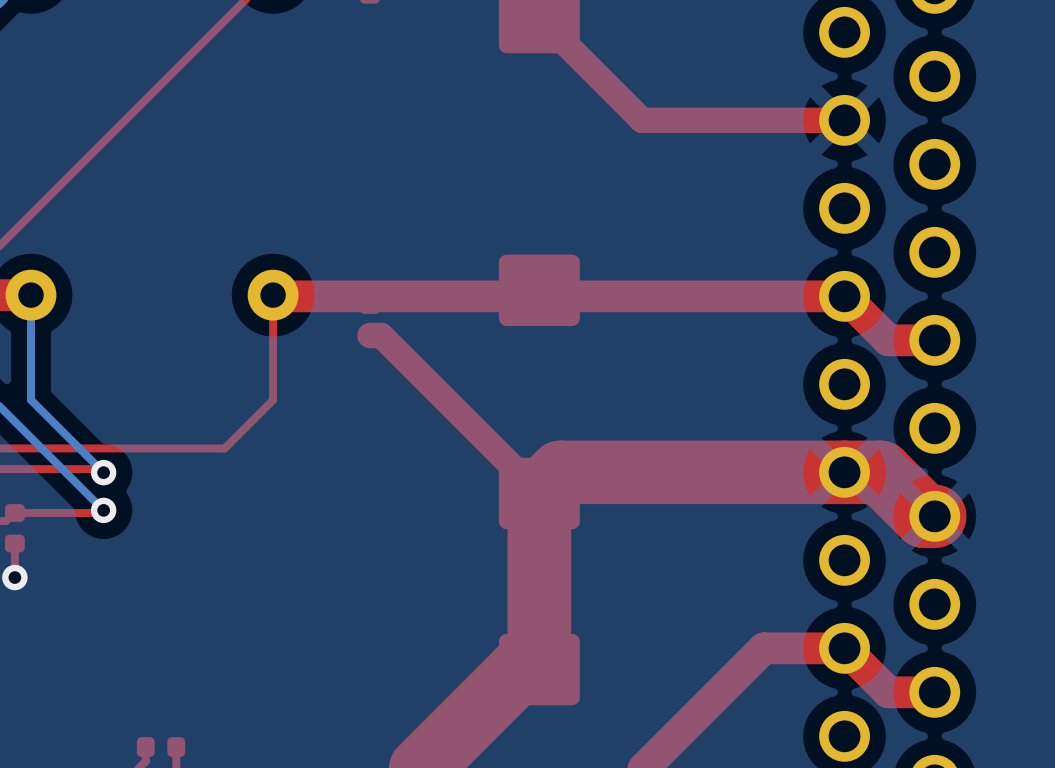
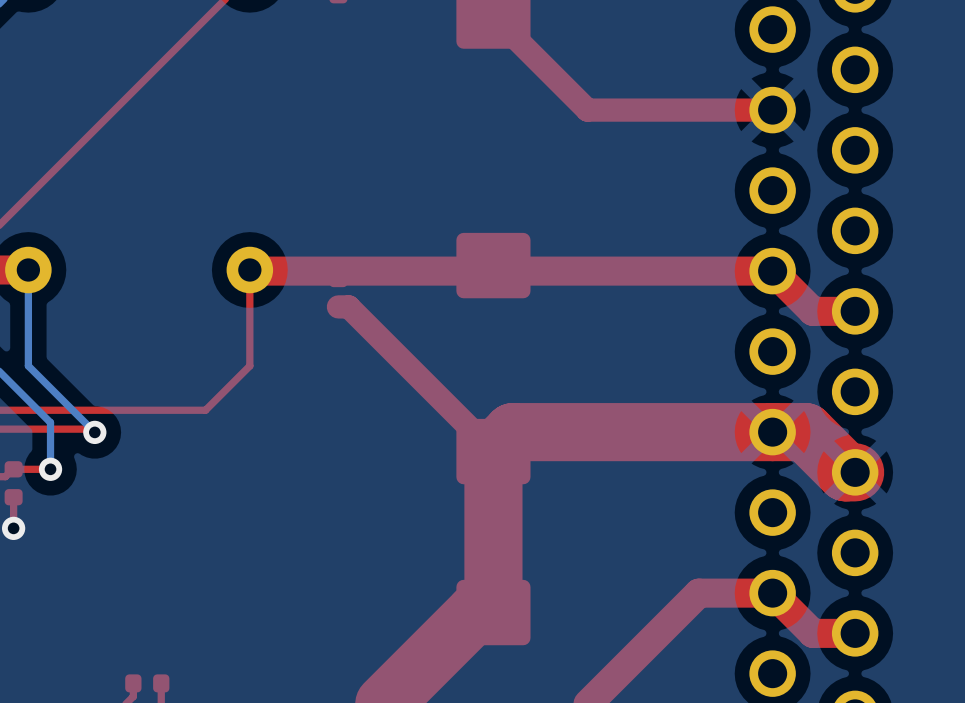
bottom track: (55, 461) (103, 510) -> (50, 422) (50, 469)
top track: (103, 510) (101, 512) (55, 512) -> none
via position: (103, 510) -> (50, 469)

